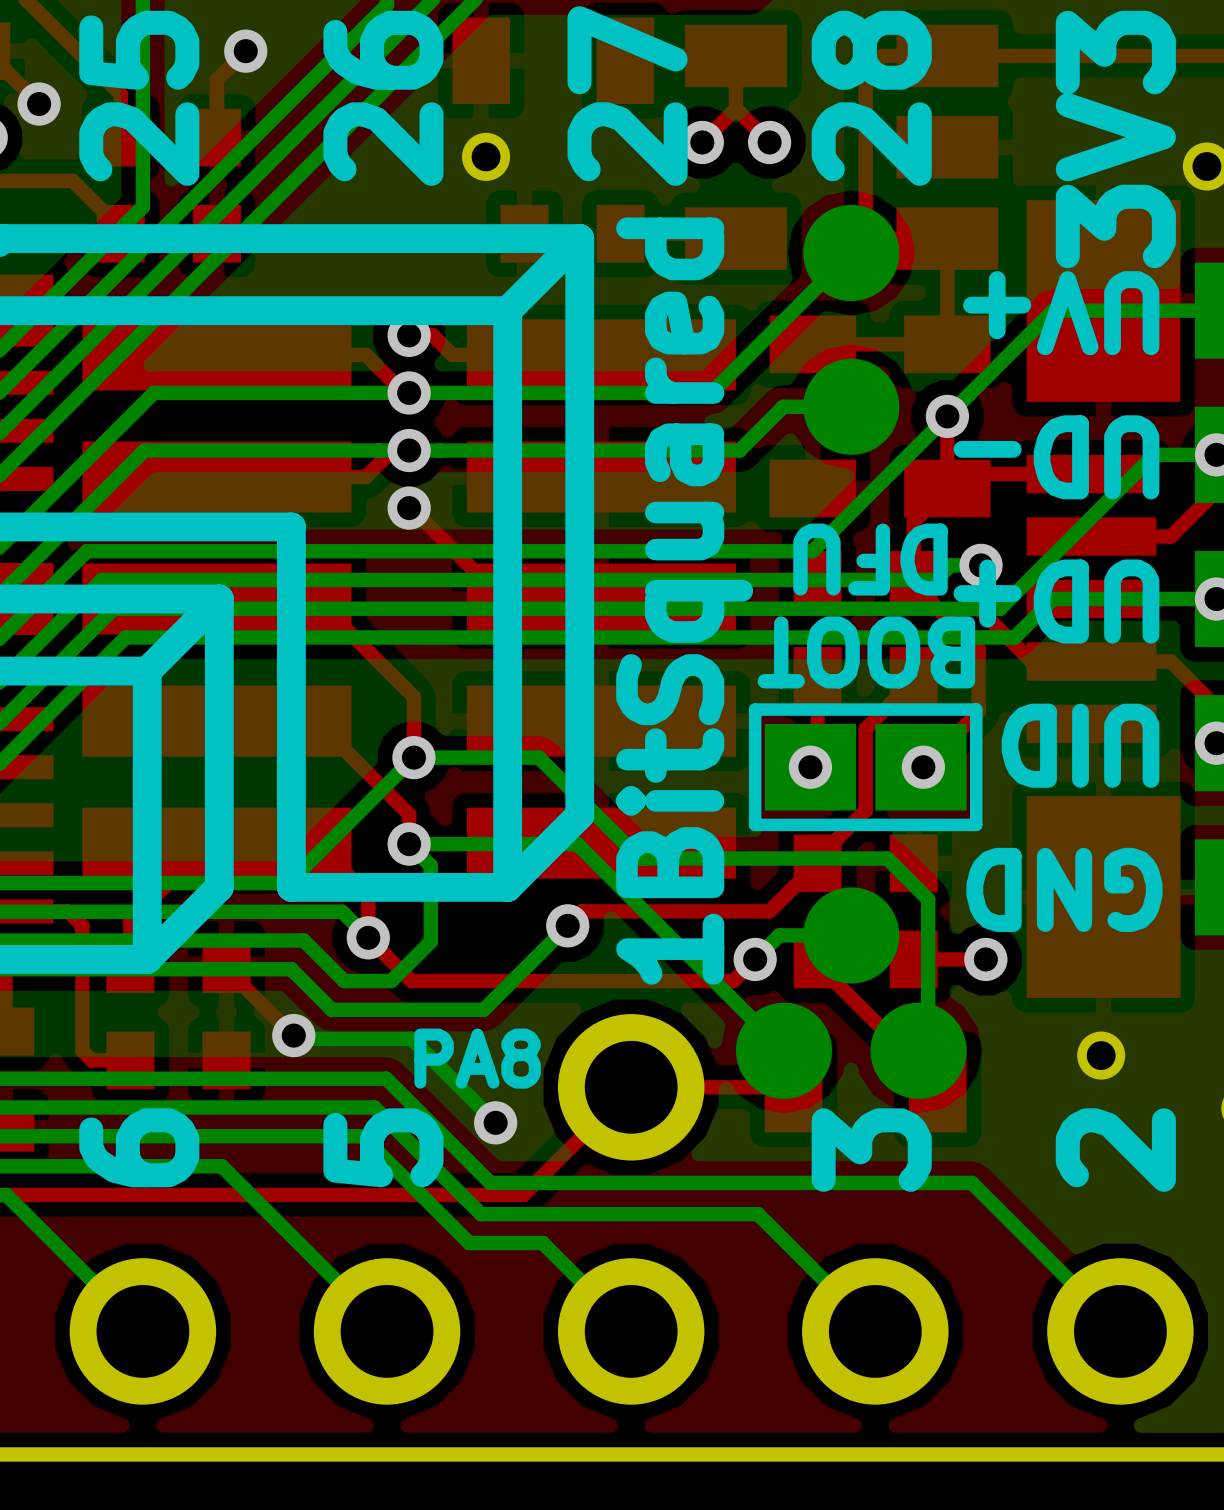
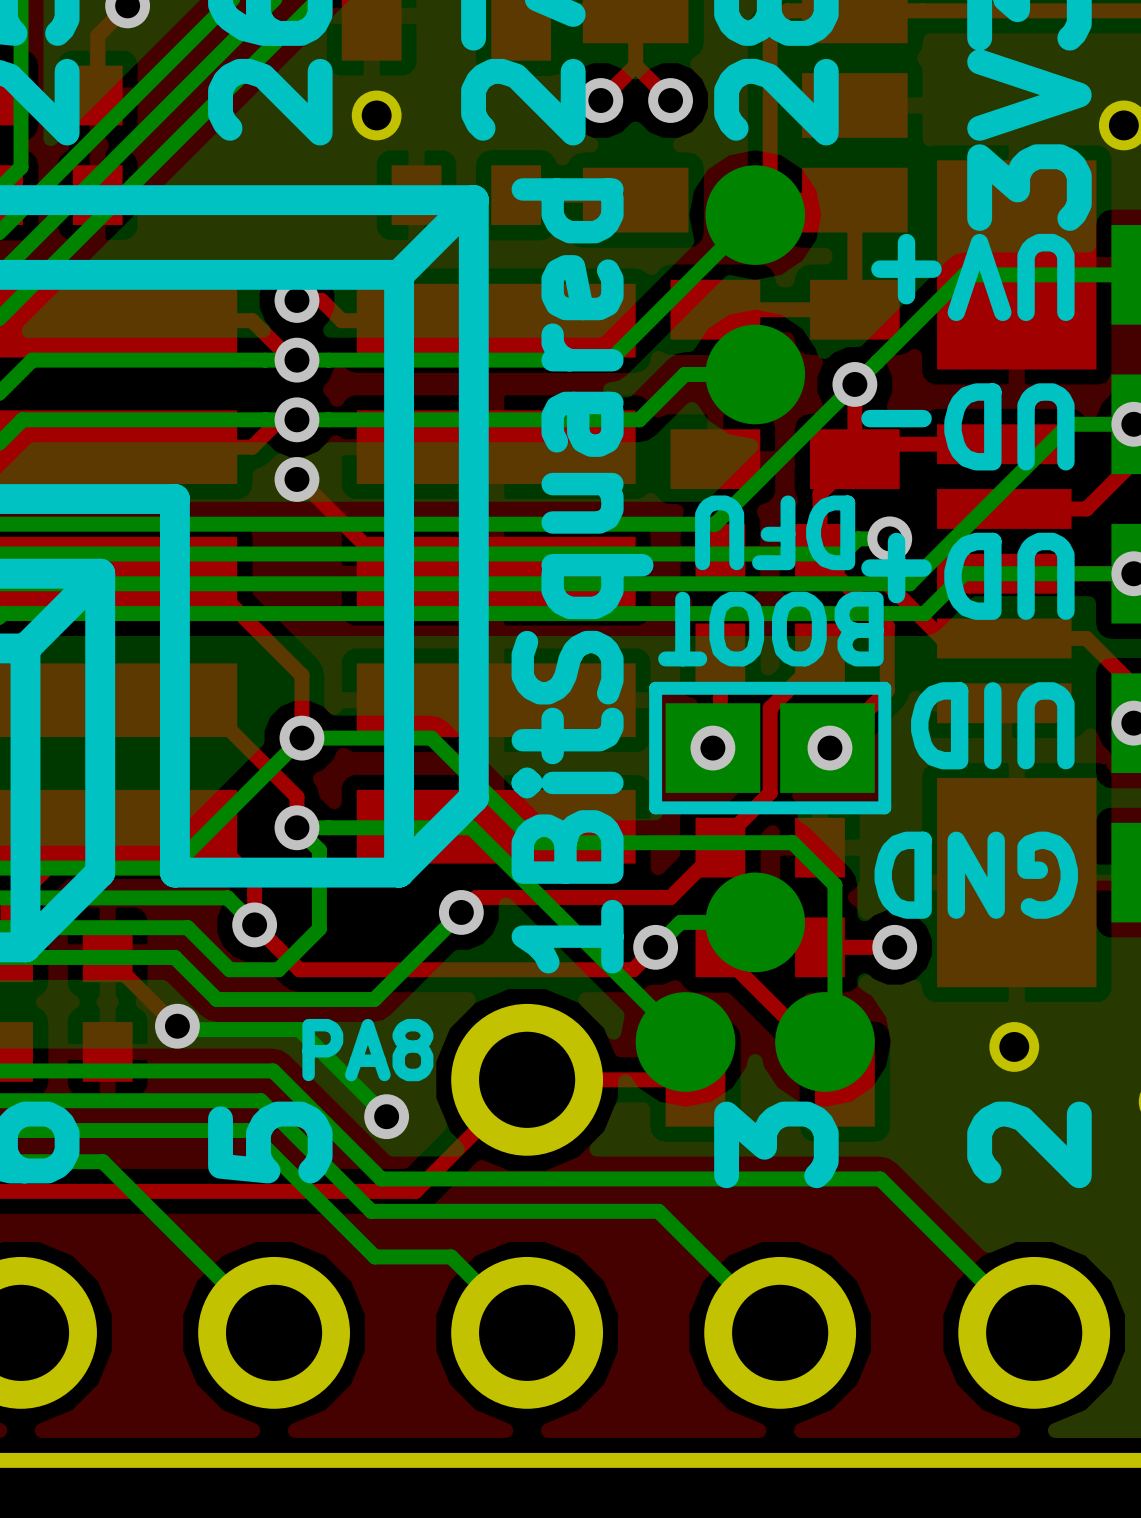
bottom track: (469, 1243) (542, 1243) (557, 1258) -> (359, 1241) (374, 1256) (451, 1256)

